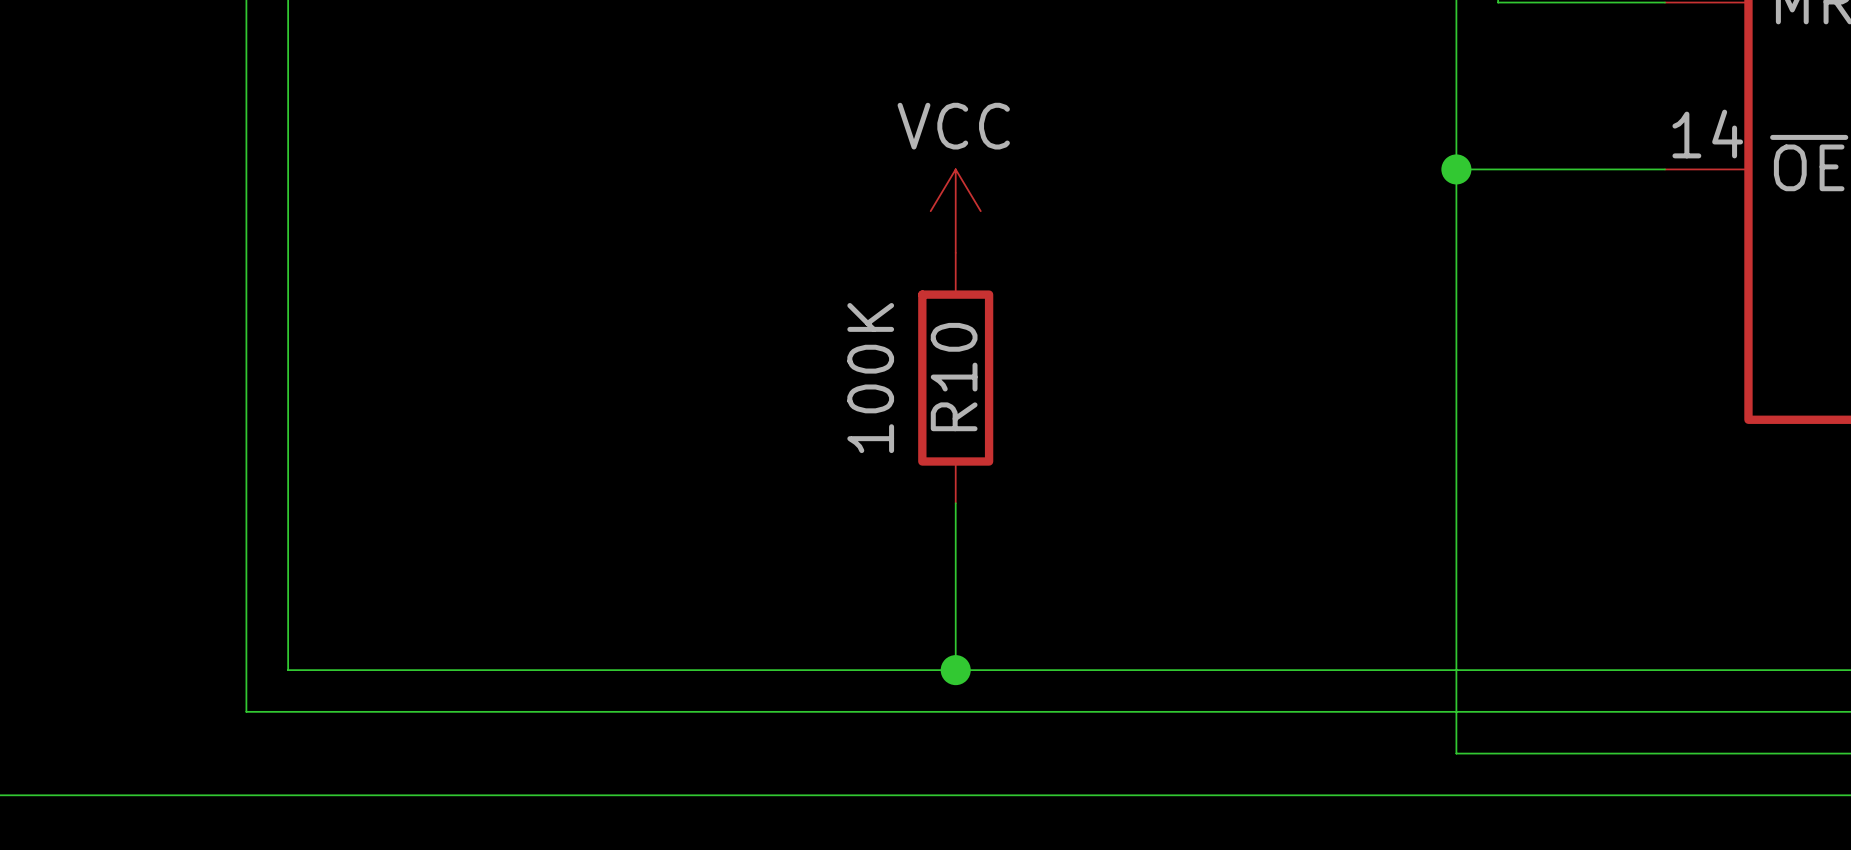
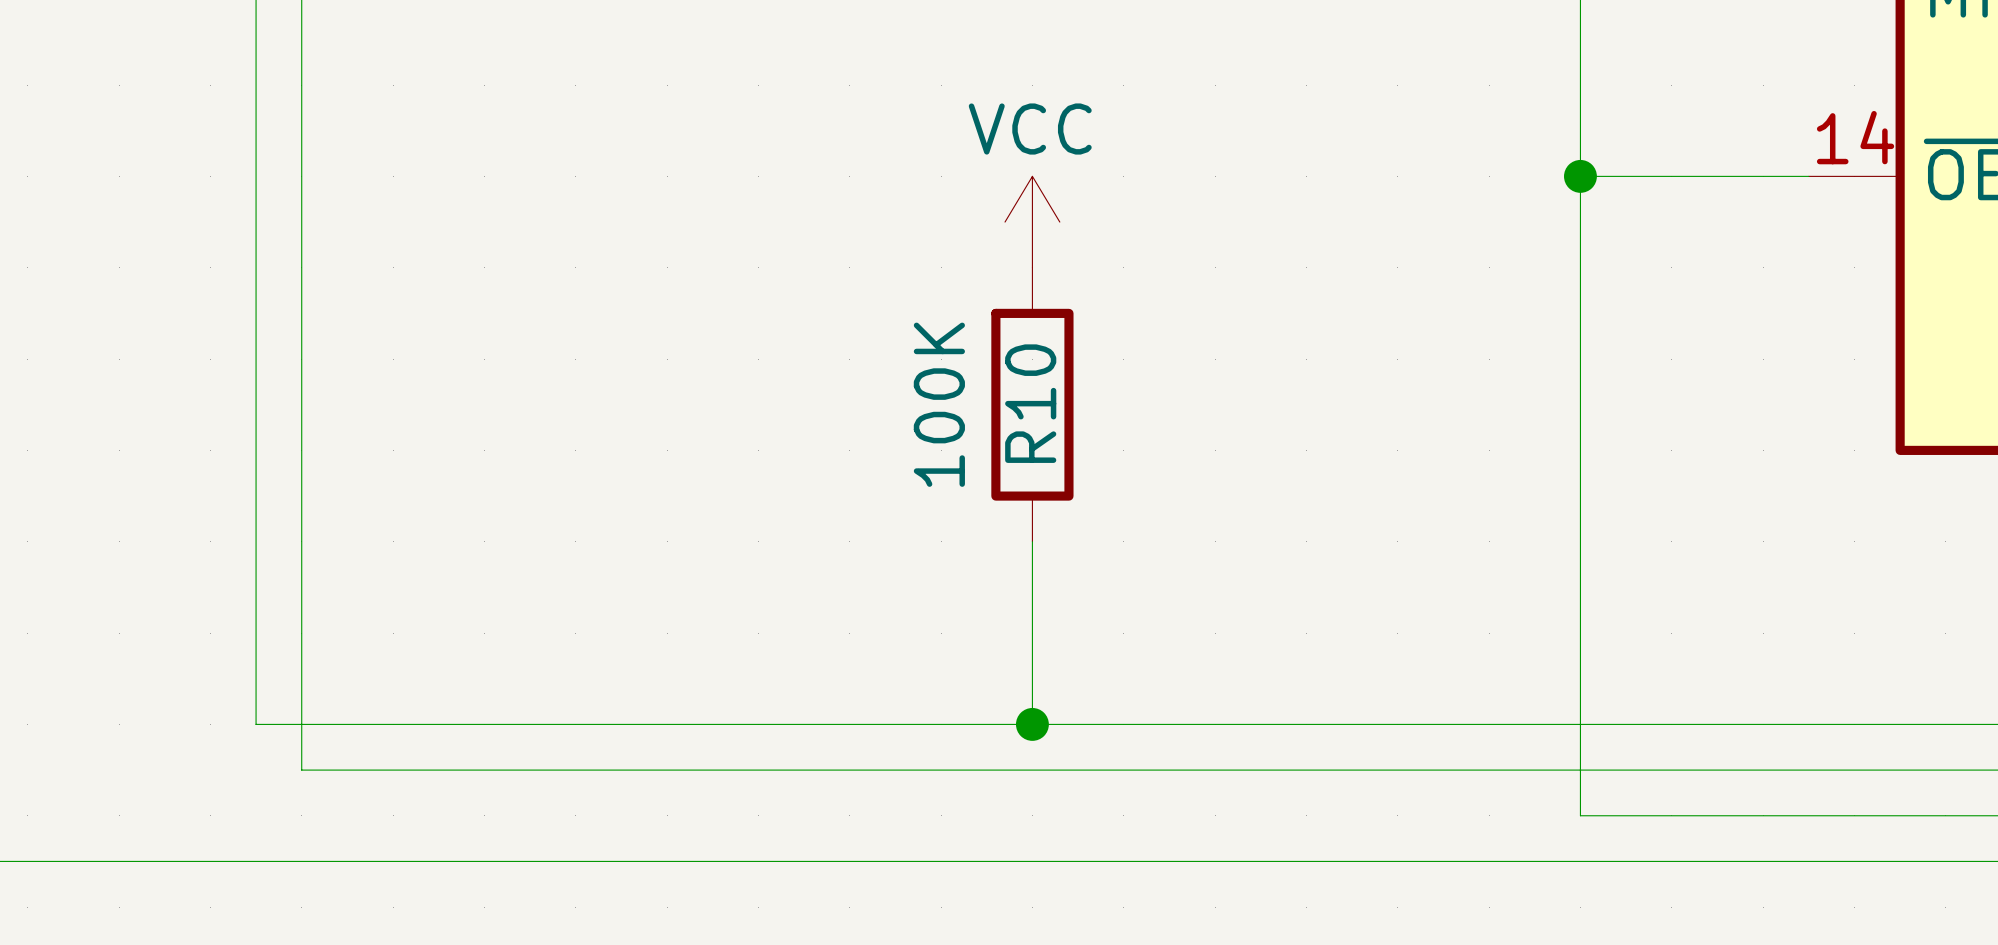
wire: (246, 670) (246, 711) (288, 711) -> (256, 724) (301, 724) (301, 770)

